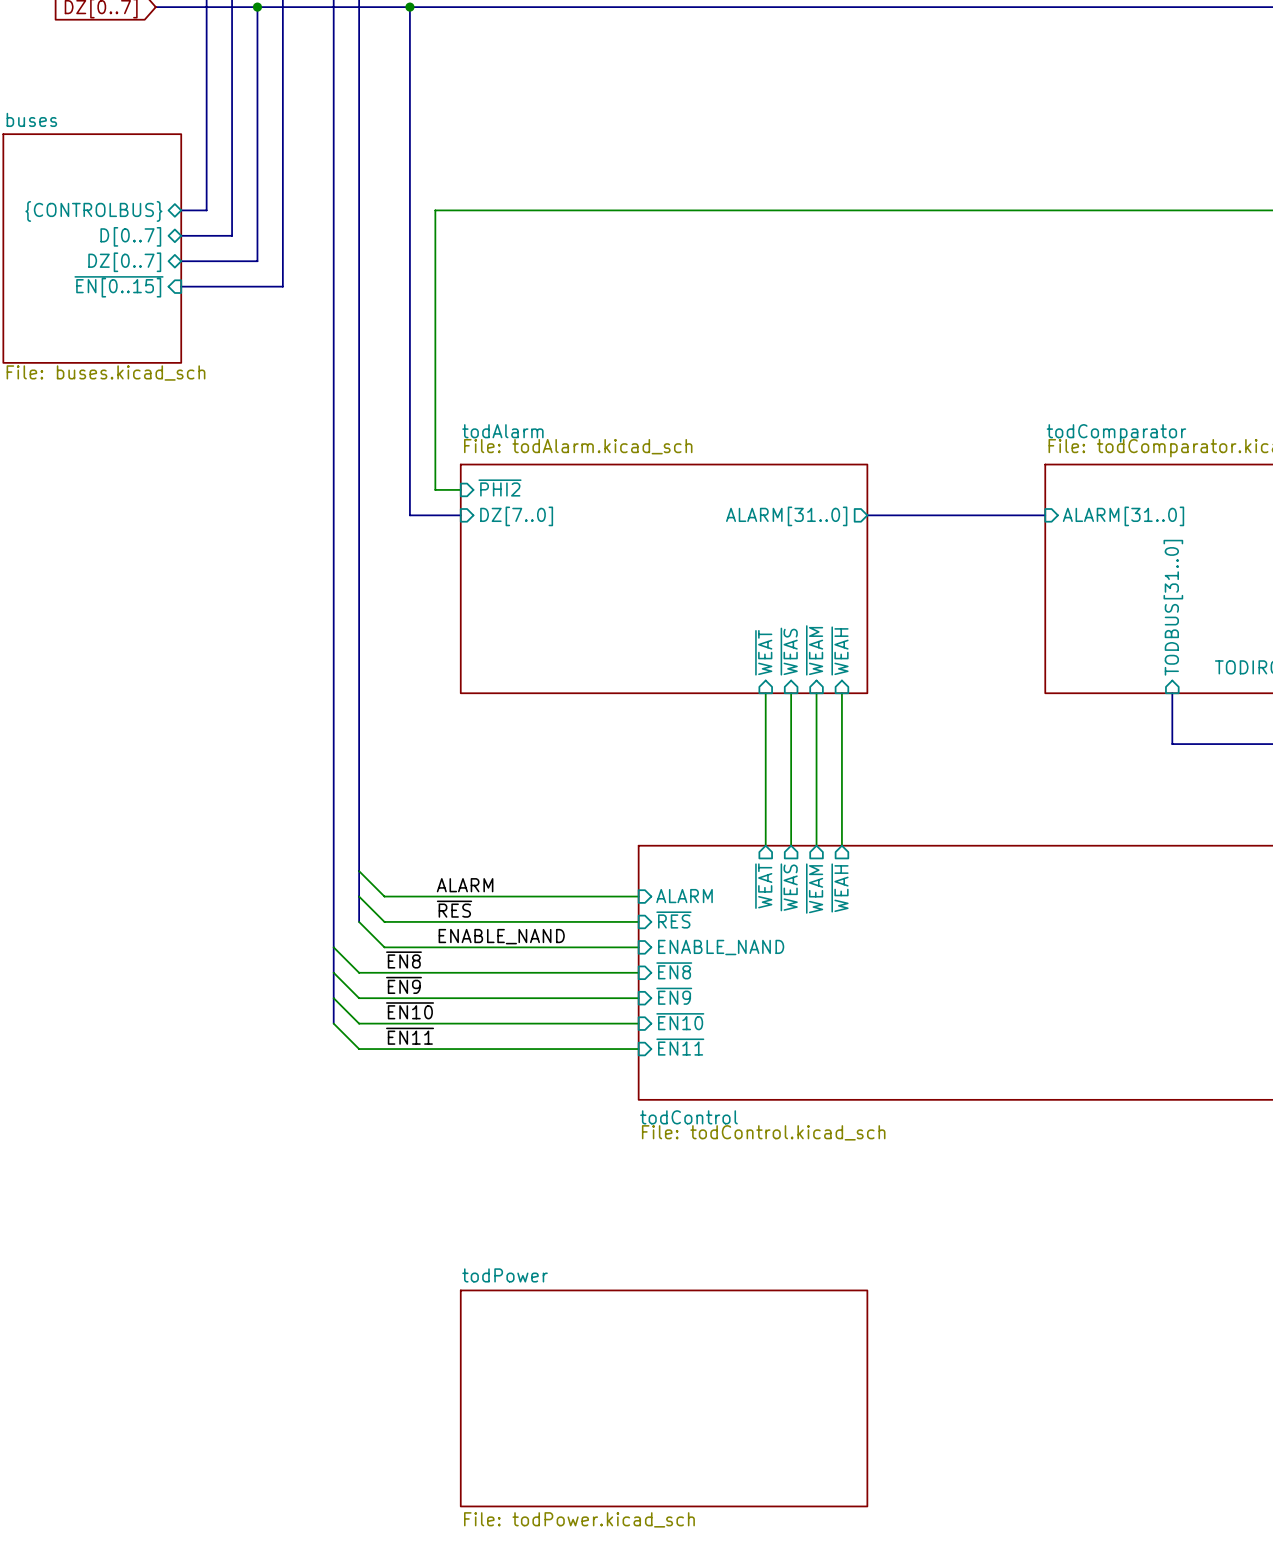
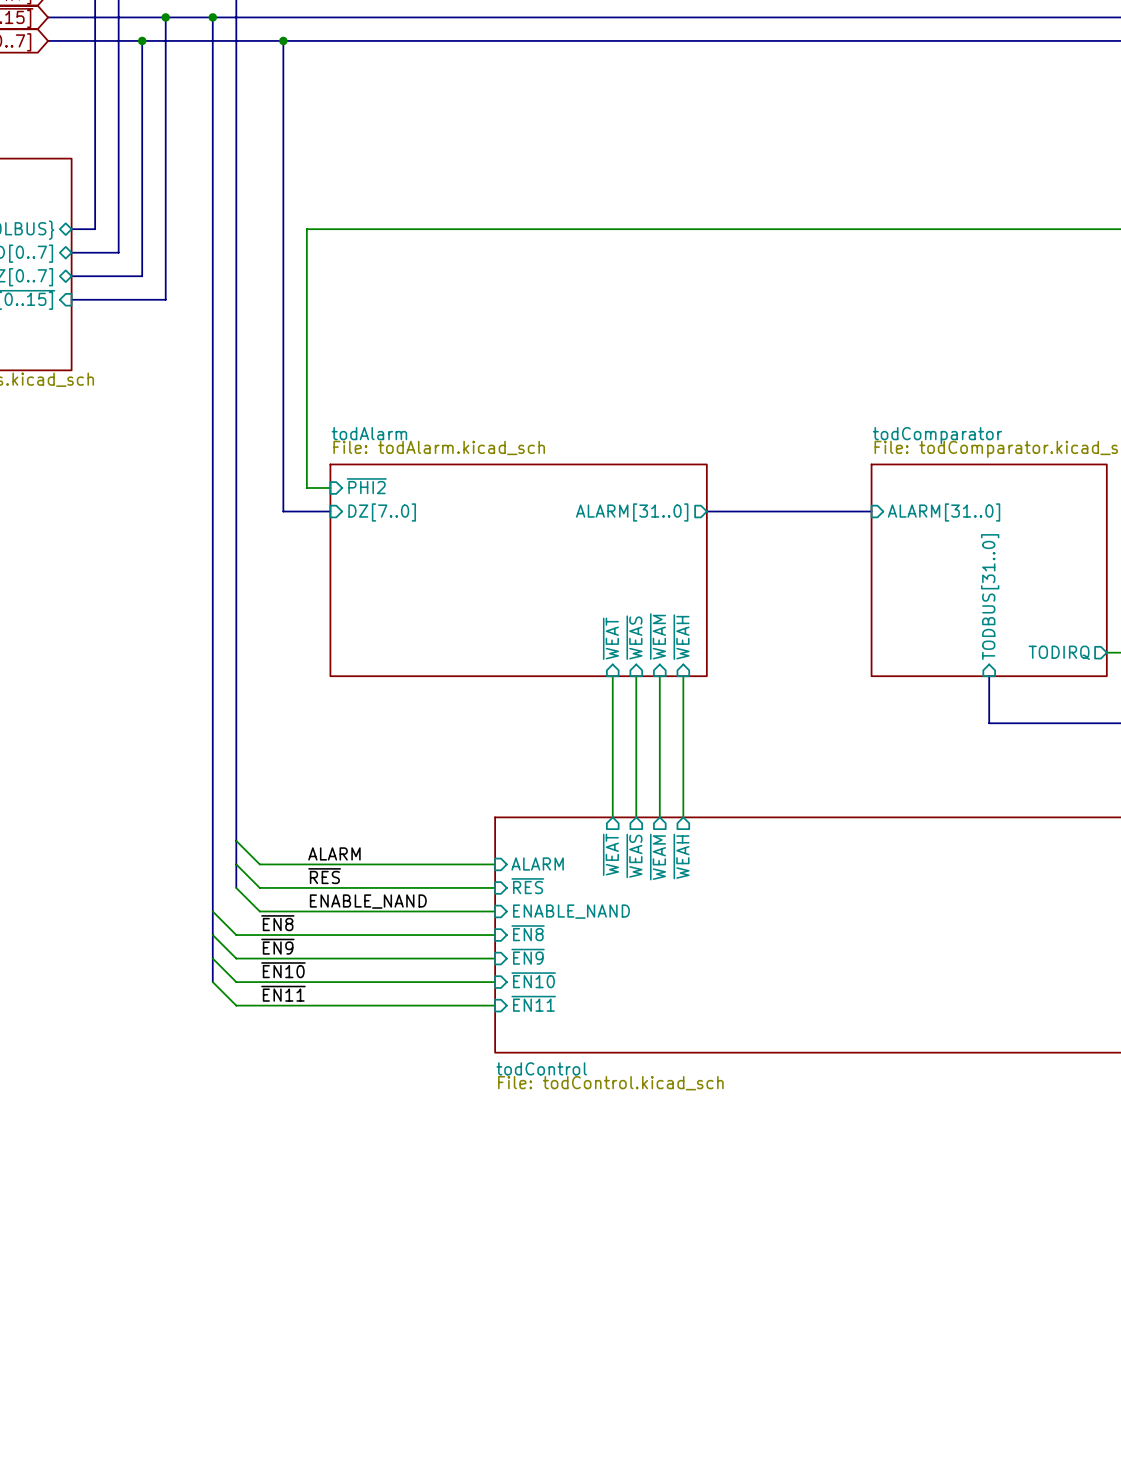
sheet todPower: File: todPower.kicad_sch (664, 1398) -> none

